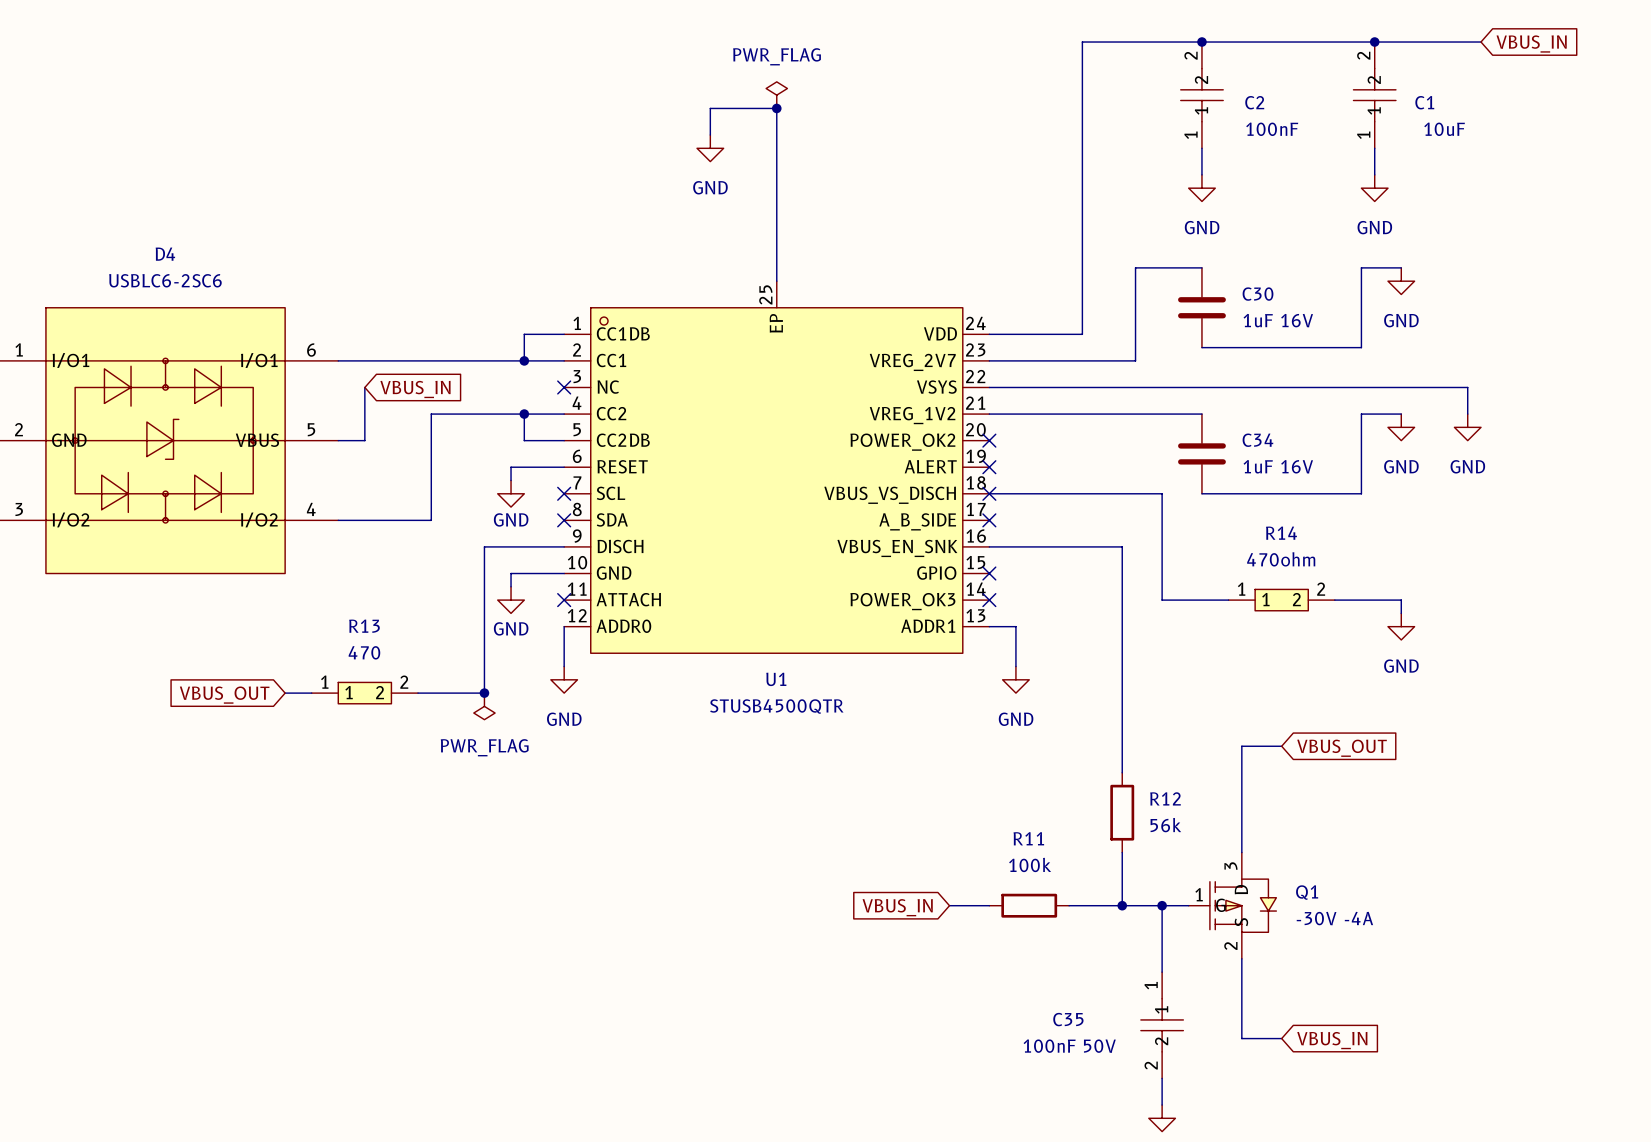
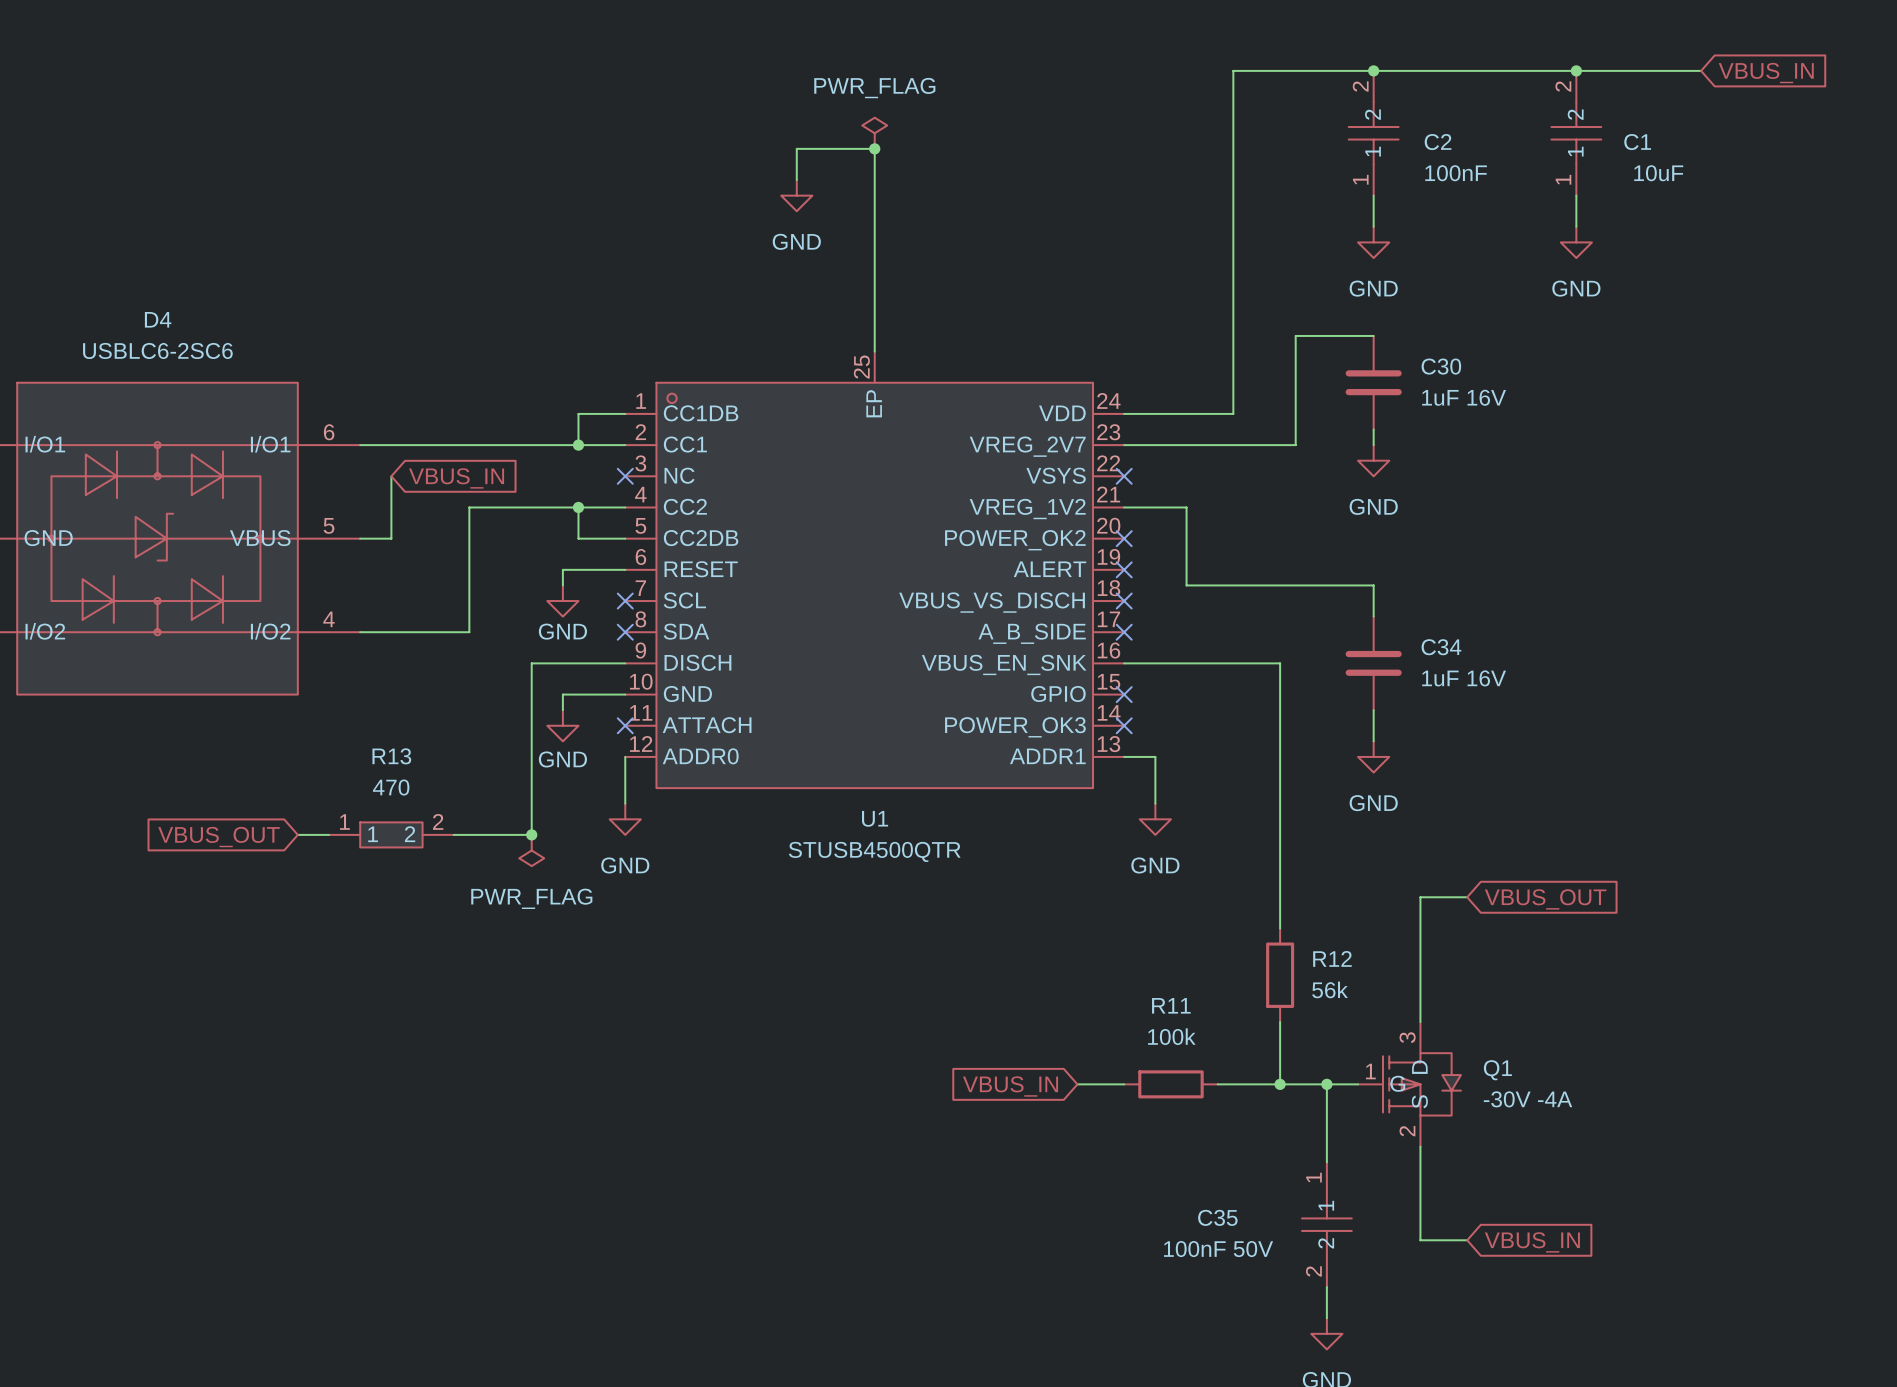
wire: (1401, 267) (1361, 267) (1361, 347) (1201, 347) -> (1373, 445) (1373, 429)
power symbol: GND (1401, 281) -> none
power symbol: none -> GND (1373, 460)
wire: (989, 387) (1467, 387) (1467, 414) -> none
no-connect mark: none -> (1124, 476)
wire: (1042, 414) (1201, 414) -> (1186, 507) (1186, 585) (1373, 585) (1373, 616)
wire: (1401, 414) (1361, 414) (1361, 493) (1201, 493) -> none
power symbol: GND (1401, 427) -> none
power symbol: GND (1467, 427) -> none
C34 position: (1201, 453) -> (1373, 663)
wire: (989, 493) (1162, 493) (1162, 600) (1228, 600) -> none
wire: none -> (1373, 710) (1373, 741)
R14: 470ohm (1281, 600) -> none
wire: (1334, 600) (1401, 600) (1401, 613) -> none
power symbol: none -> GND (1373, 756)
power symbol: GND (1401, 626) -> none

